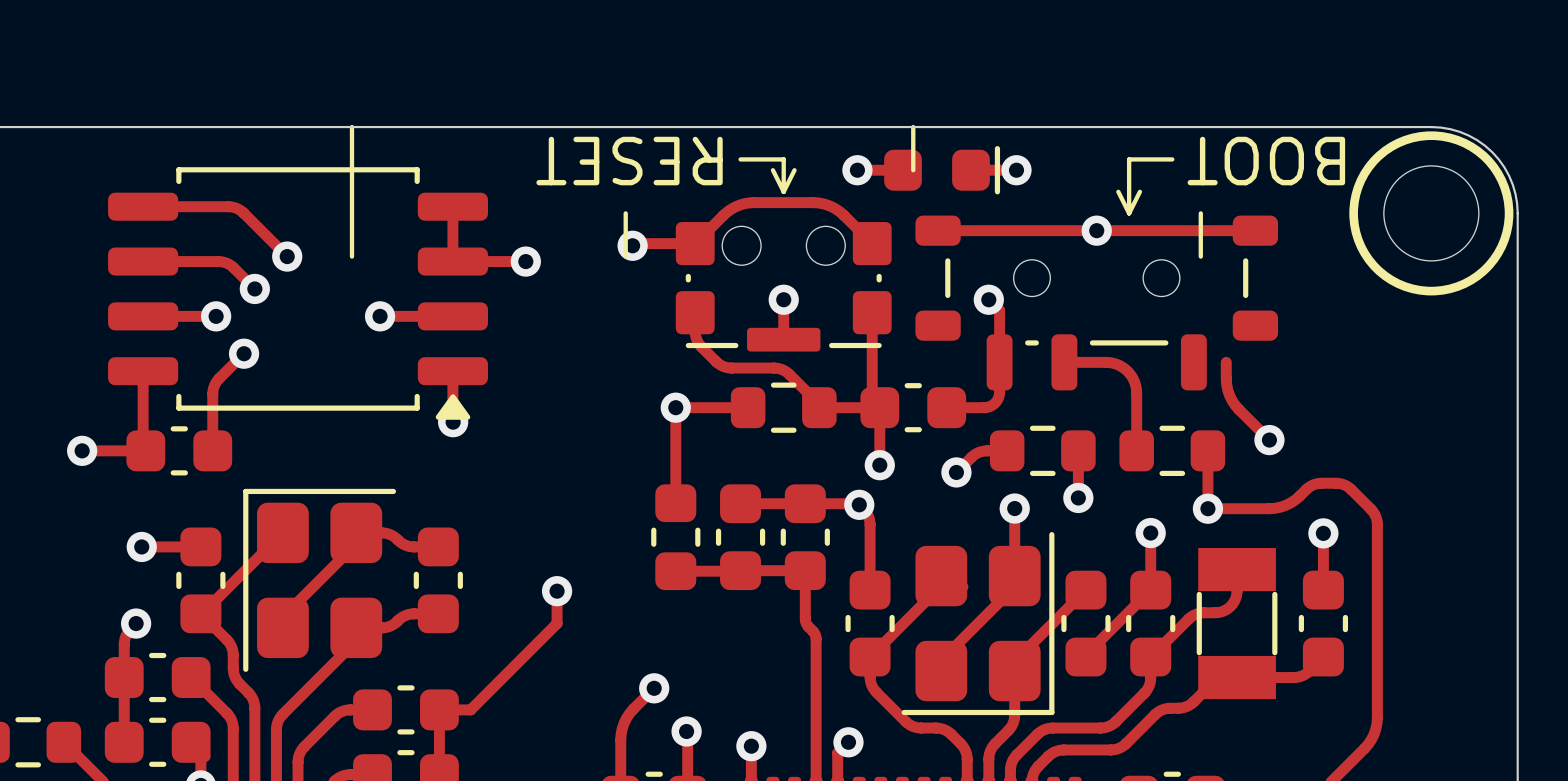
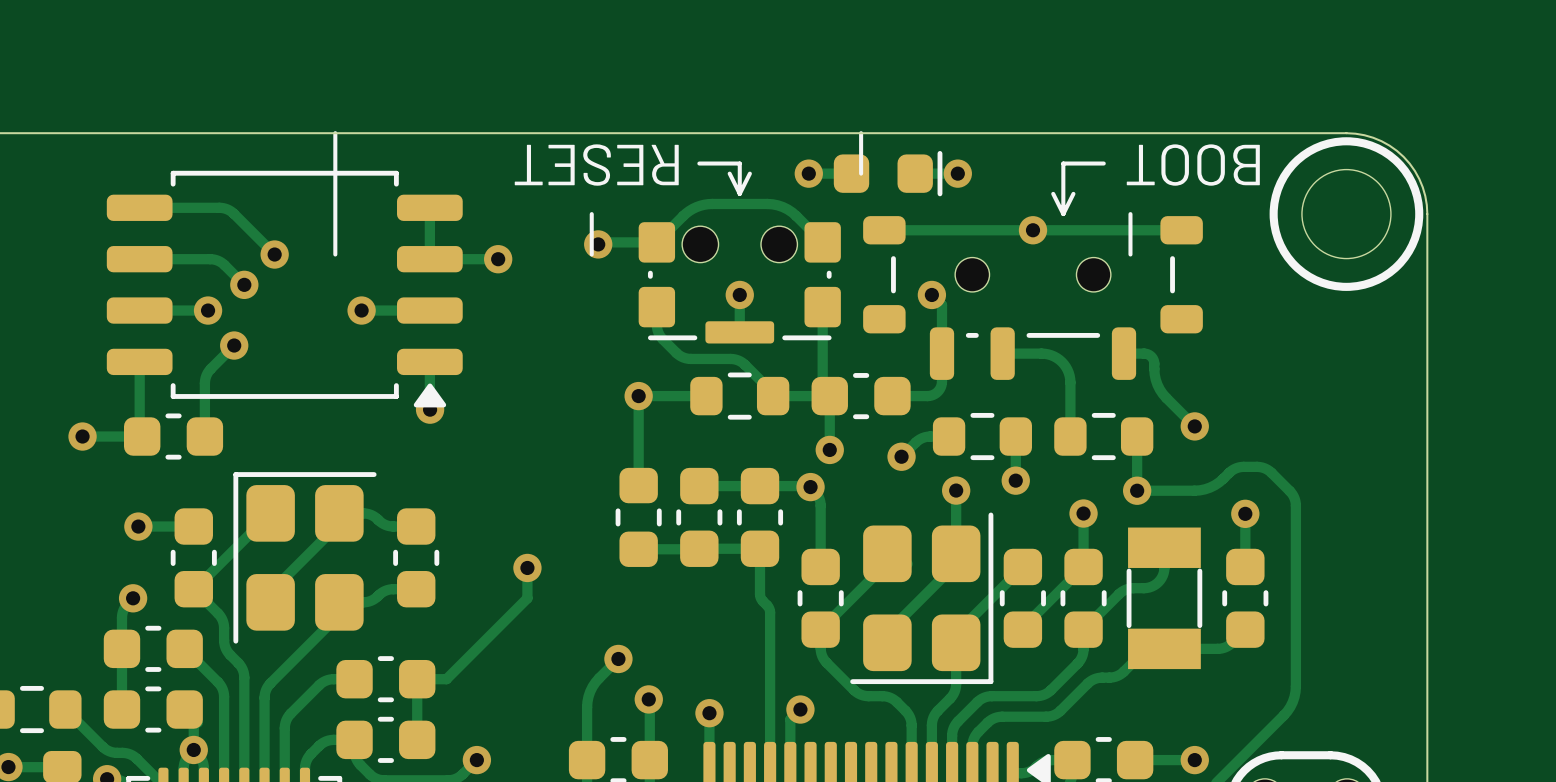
track: (1226, 362) (1226, 373) -> (1124, 353) (1146, 353) (1152, 357) (1154, 363)

